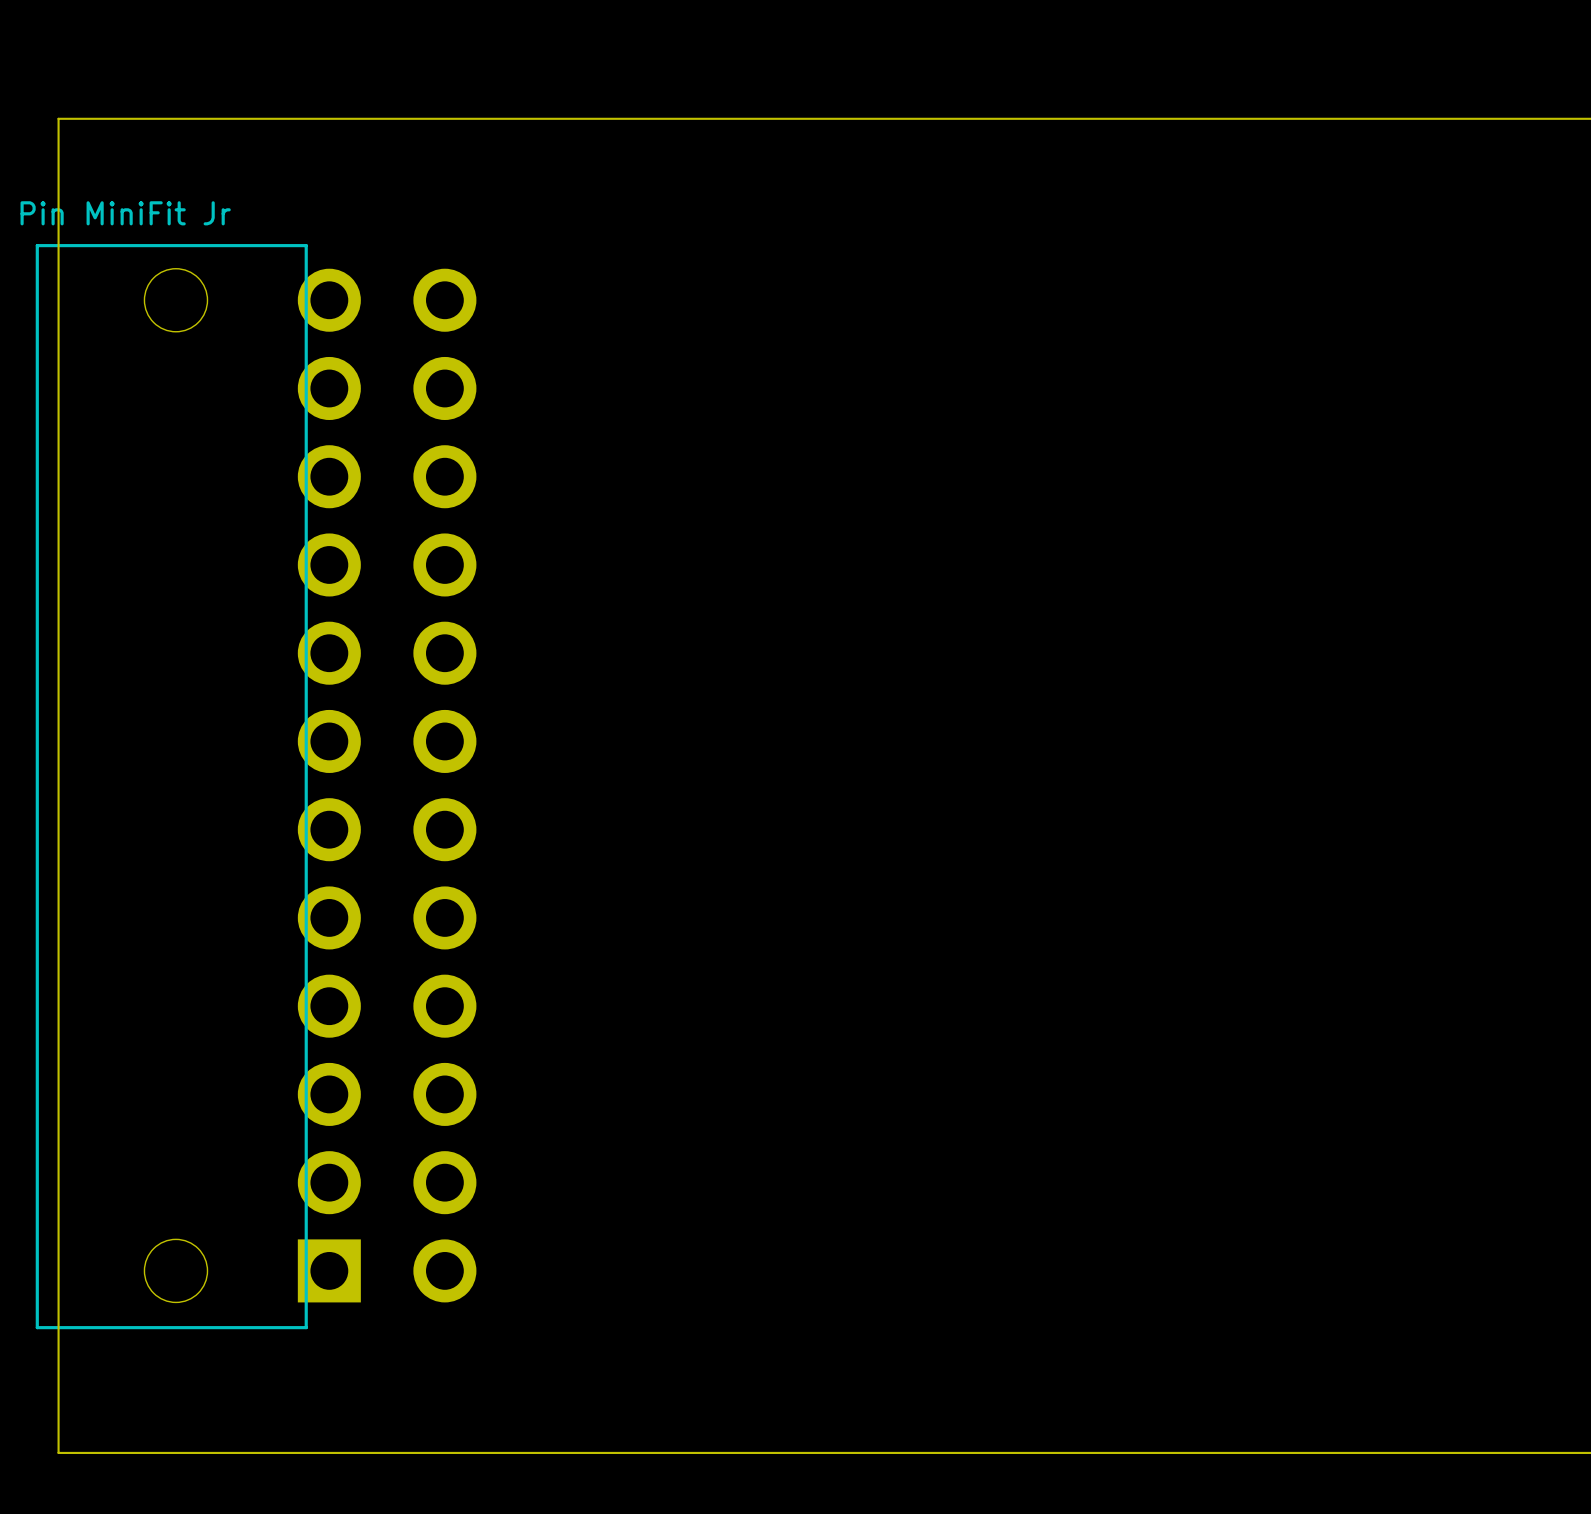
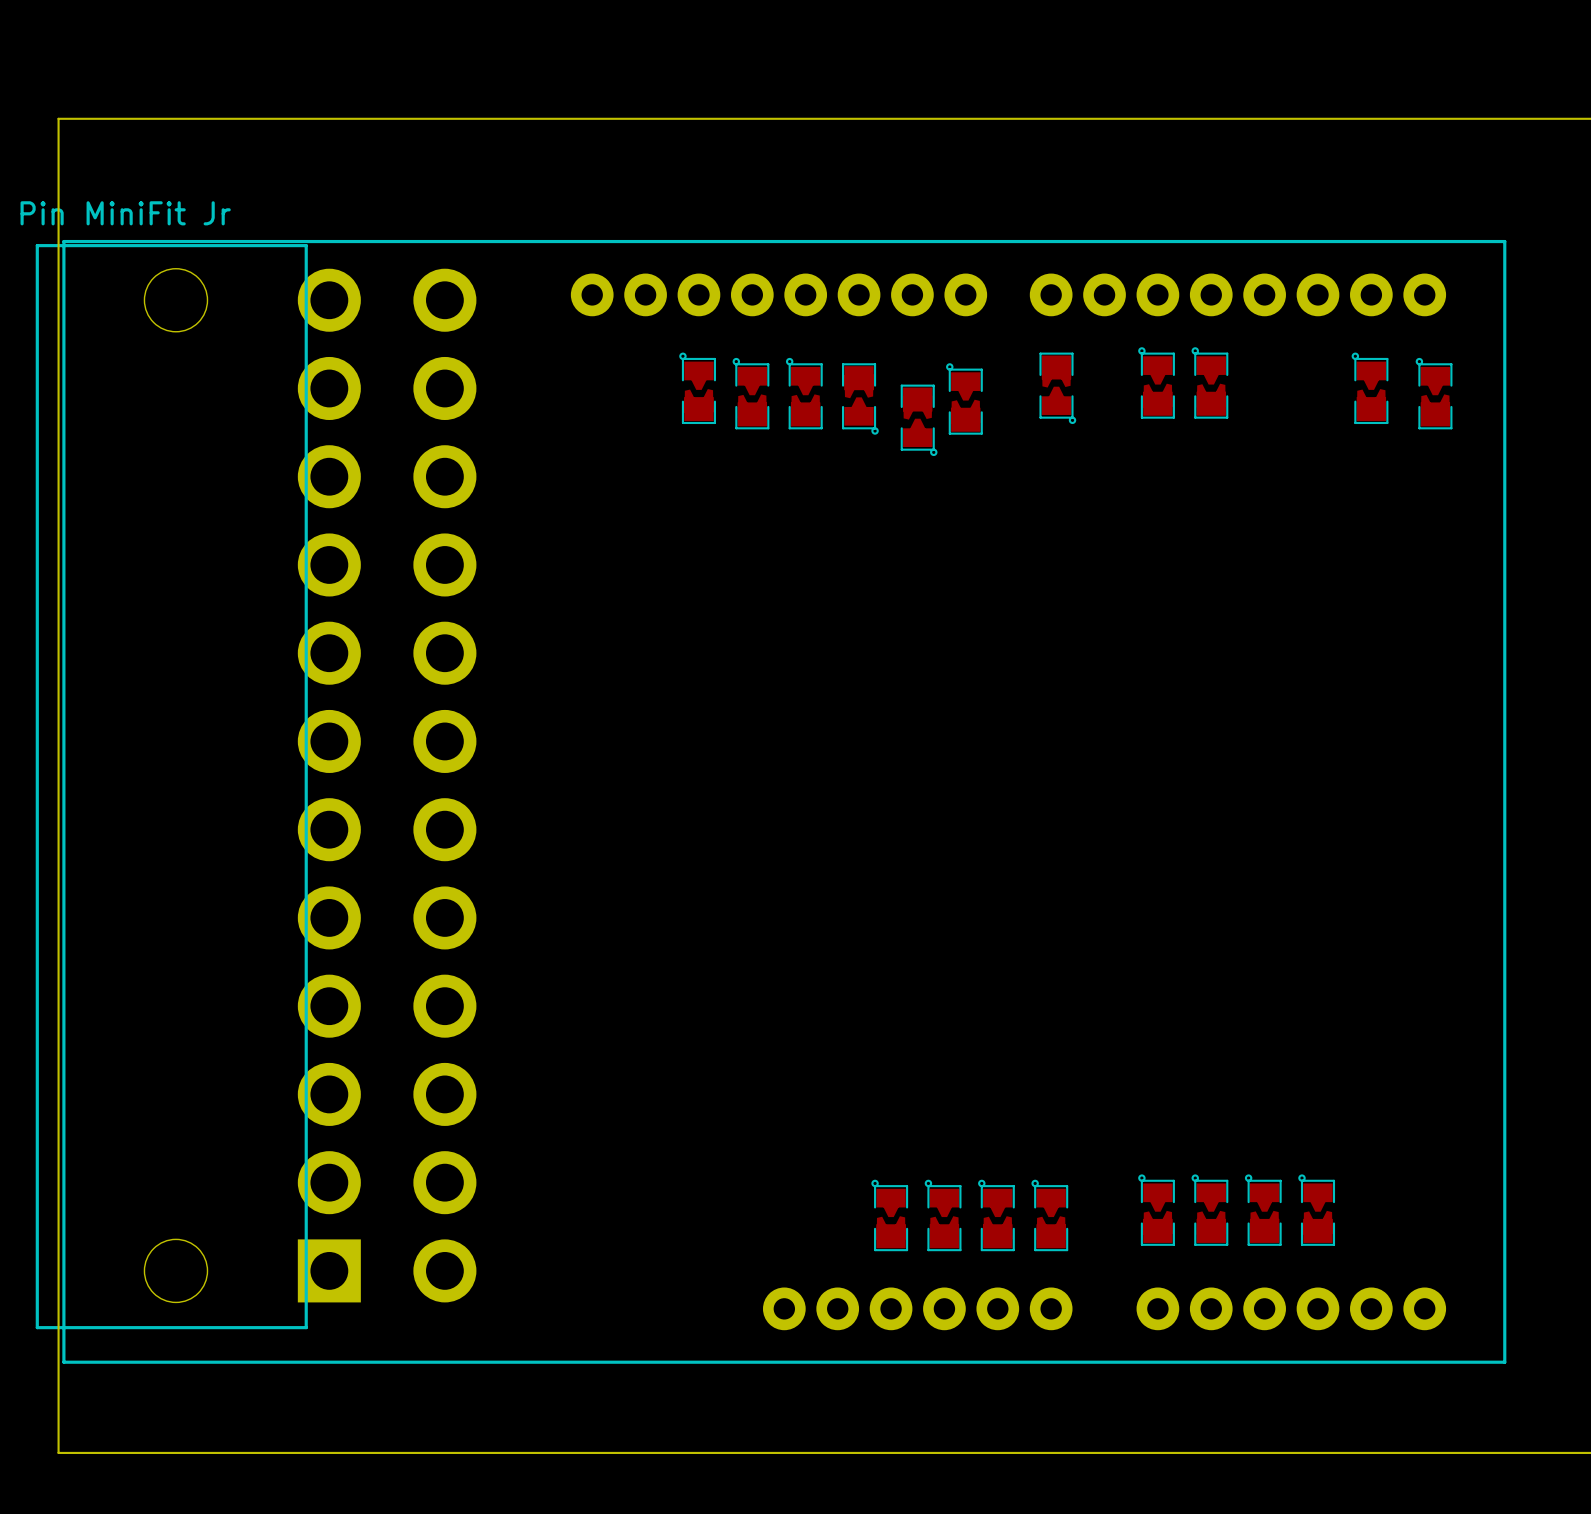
part: none -> (1156, 382)
part: none -> (1209, 382)
part: none -> (697, 388)
part: none -> (1057, 388)
part: none -> (1370, 388)
part: none -> (750, 393)
part: none -> (804, 393)
part: none -> (1434, 393)
part: none -> (860, 398)
part: none -> (964, 398)
part: none -> (919, 420)
part: none -> (784, 801)
part: none -> (1156, 1210)
part: none -> (1209, 1210)
part: none -> (1263, 1210)
part: none -> (1316, 1210)
part: none -> (889, 1215)
part: none -> (943, 1215)
part: none -> (996, 1215)
part: none -> (1049, 1215)

